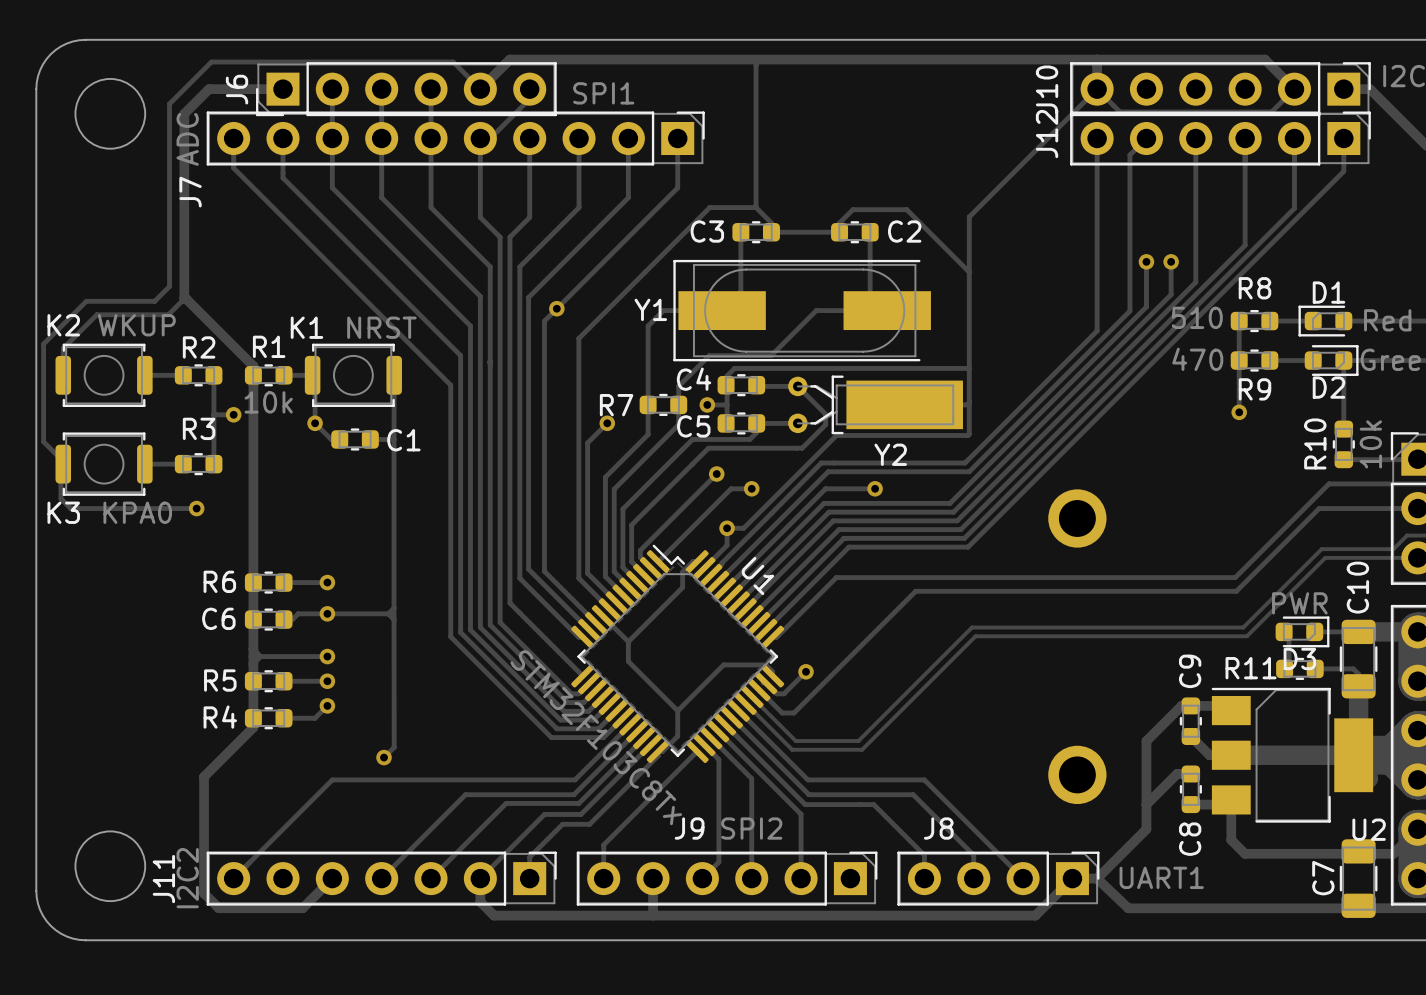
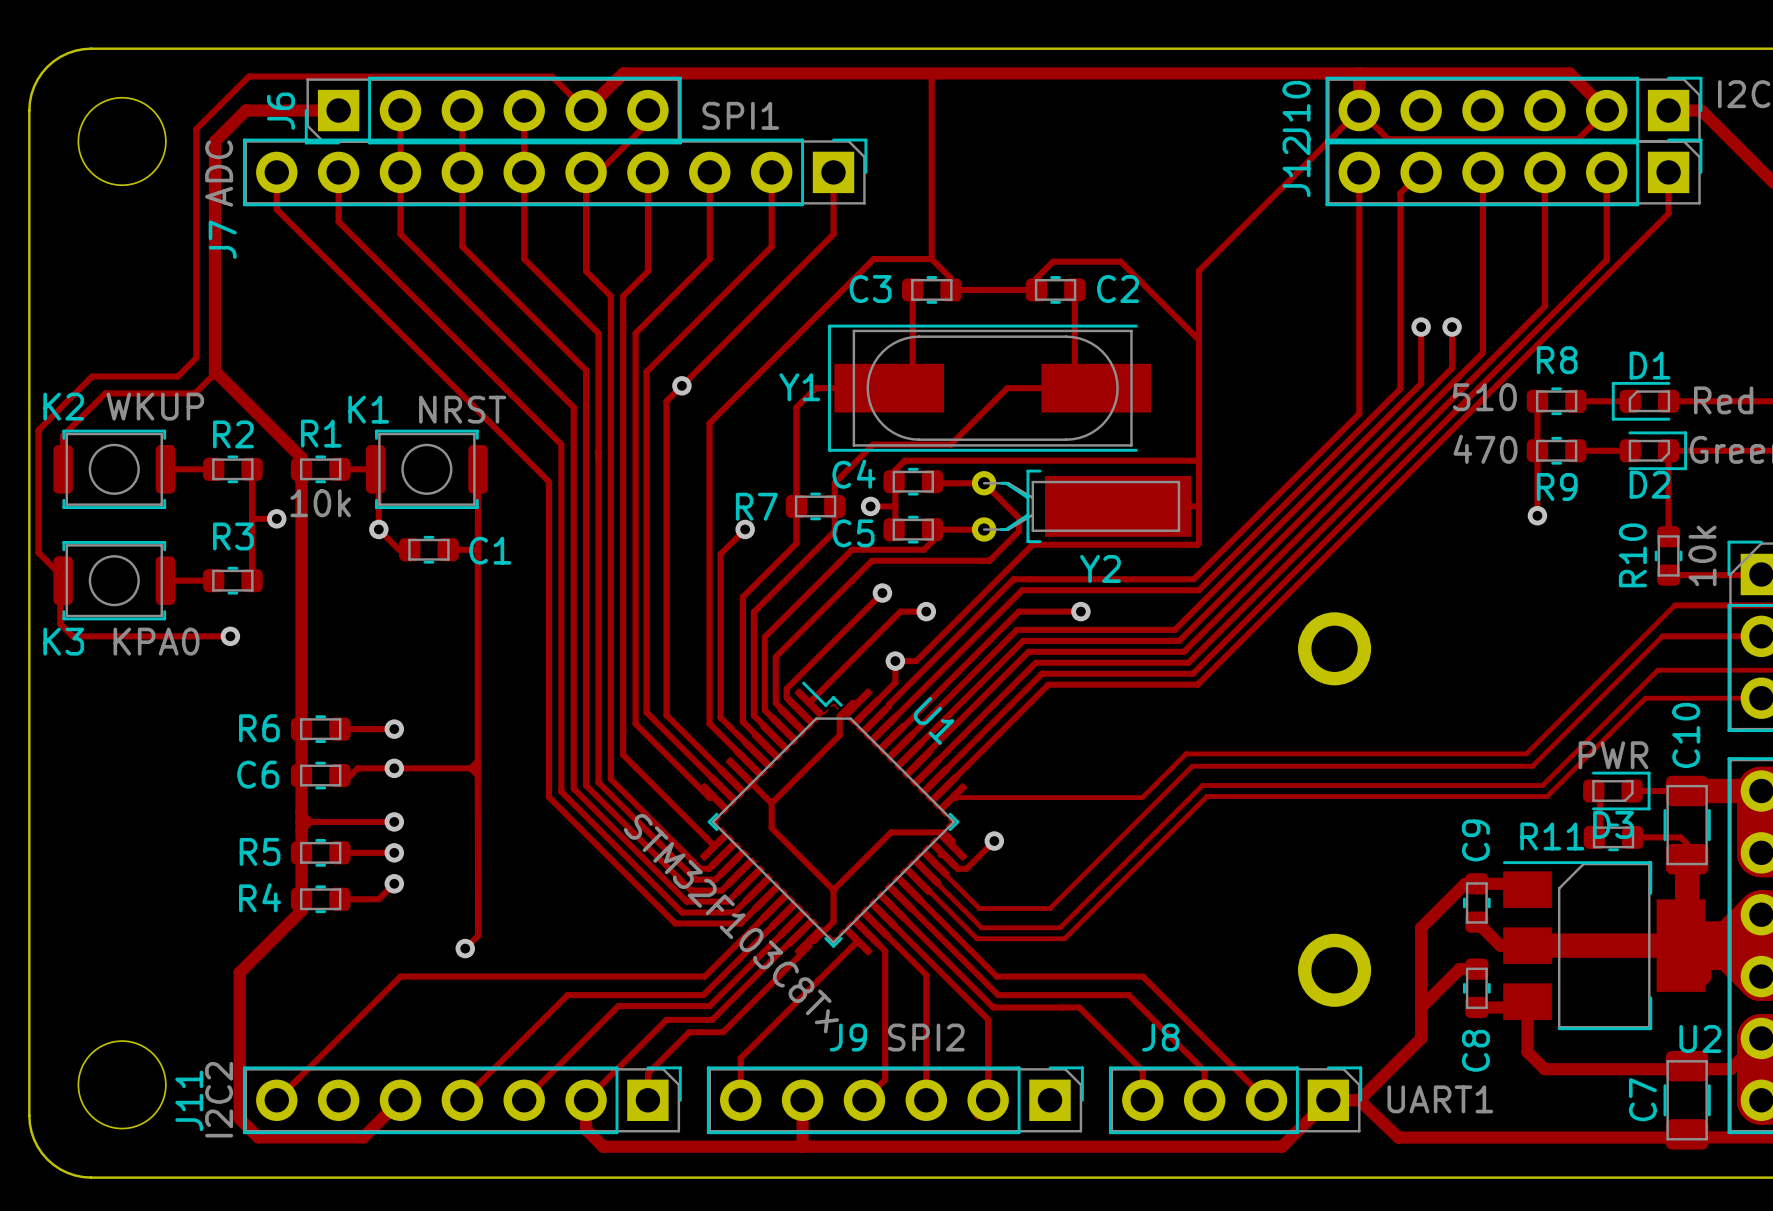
track: (1348, 483) (1329, 483) (1235, 577) (836, 577) (776, 637) -> (1674, 605) (1526, 753) (1186, 753) (1142, 797) (957, 797)
track: (1338, 508) (1319, 508) (1236, 591) (915, 591) (793, 713) (782, 713) (760, 691) -> (1662, 636) (1532, 766) (1192, 766) (1050, 908) (979, 908) (934, 863)
track: (1407, 535) (1393, 549) (1321, 549) -> (1747, 670) (1657, 670) (1640, 687)

